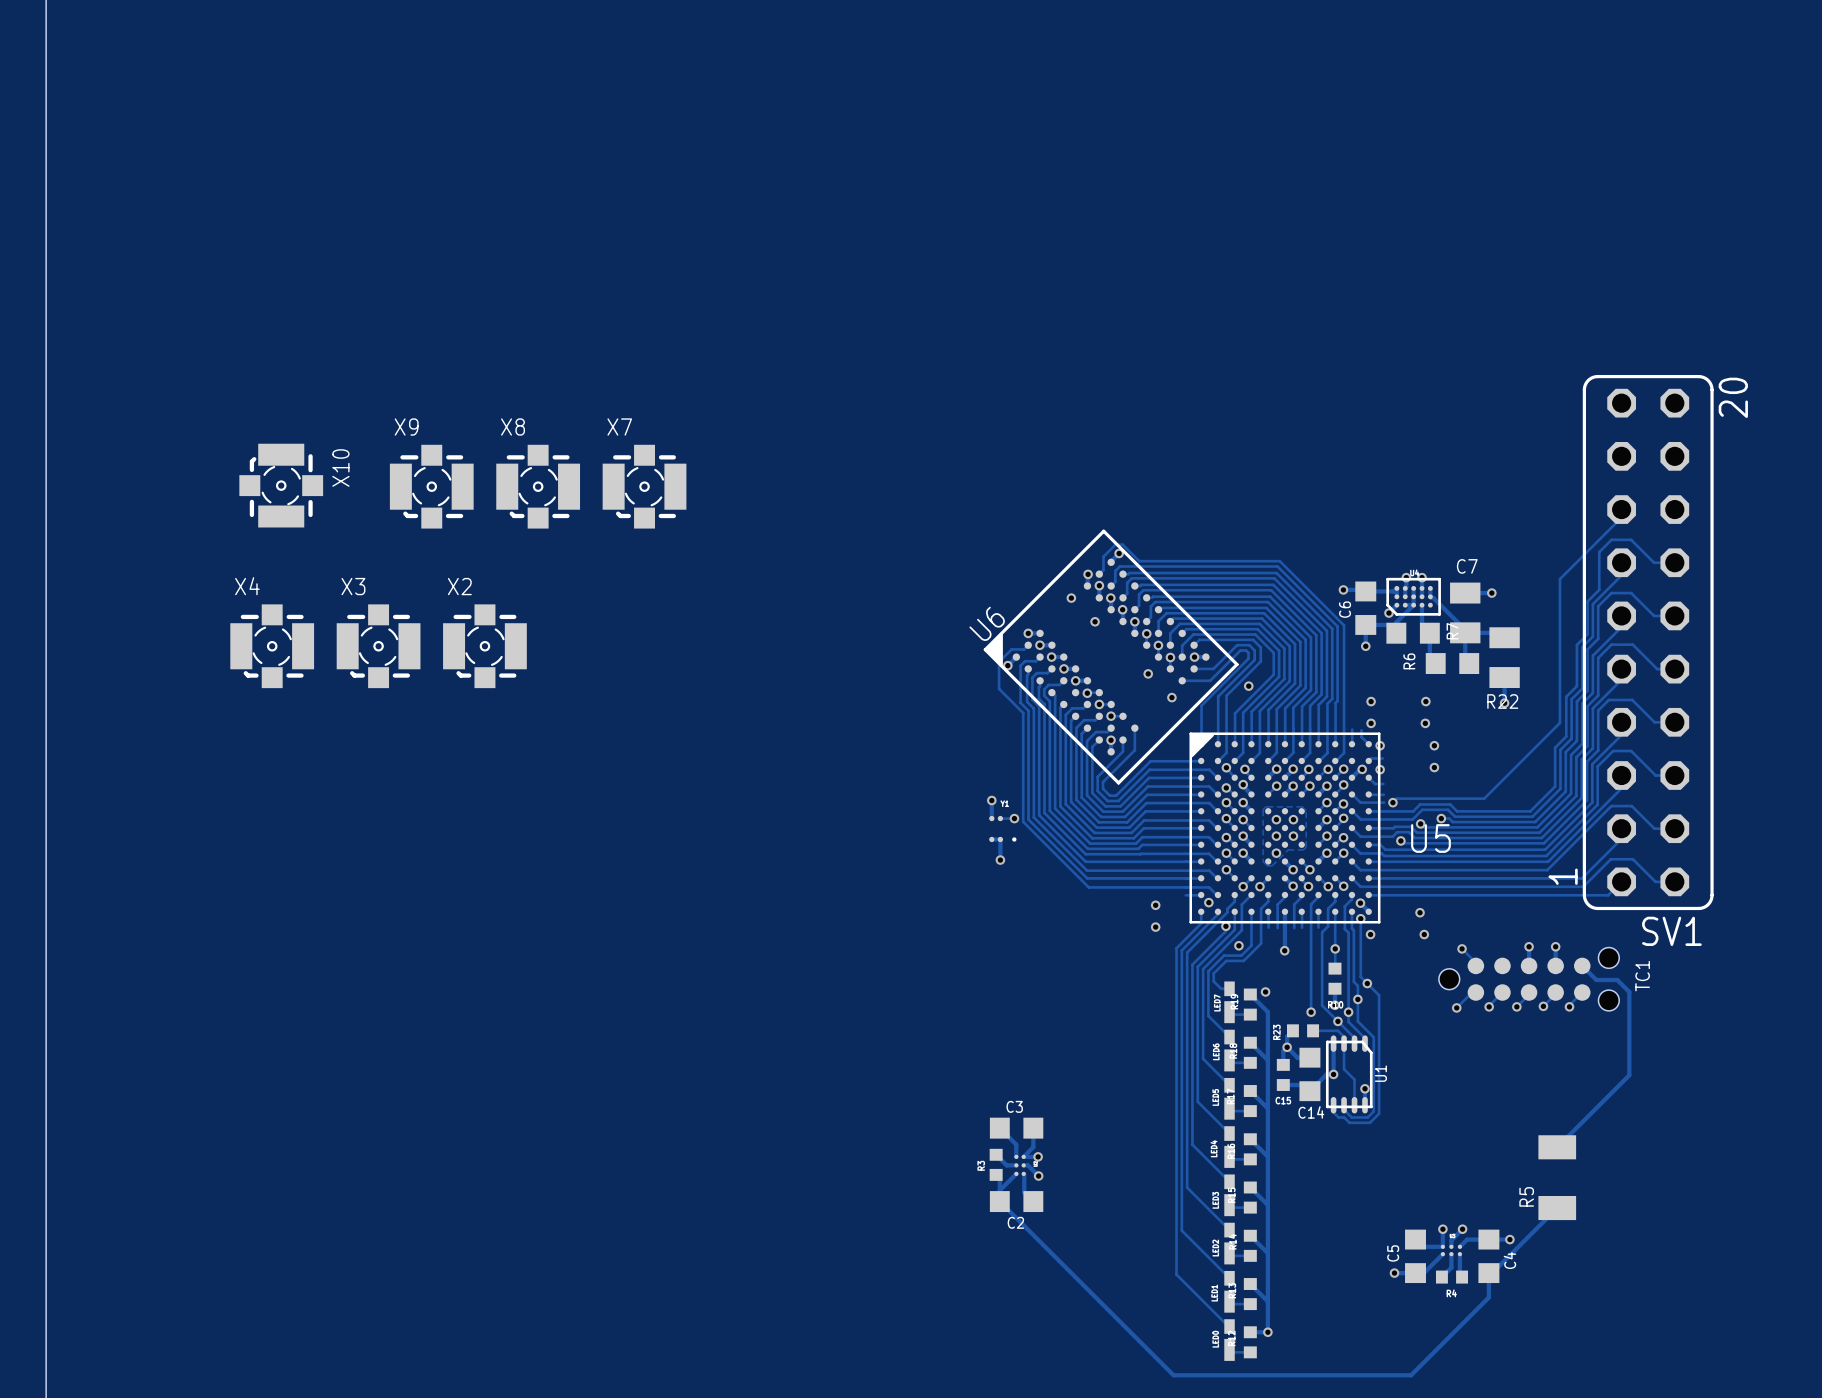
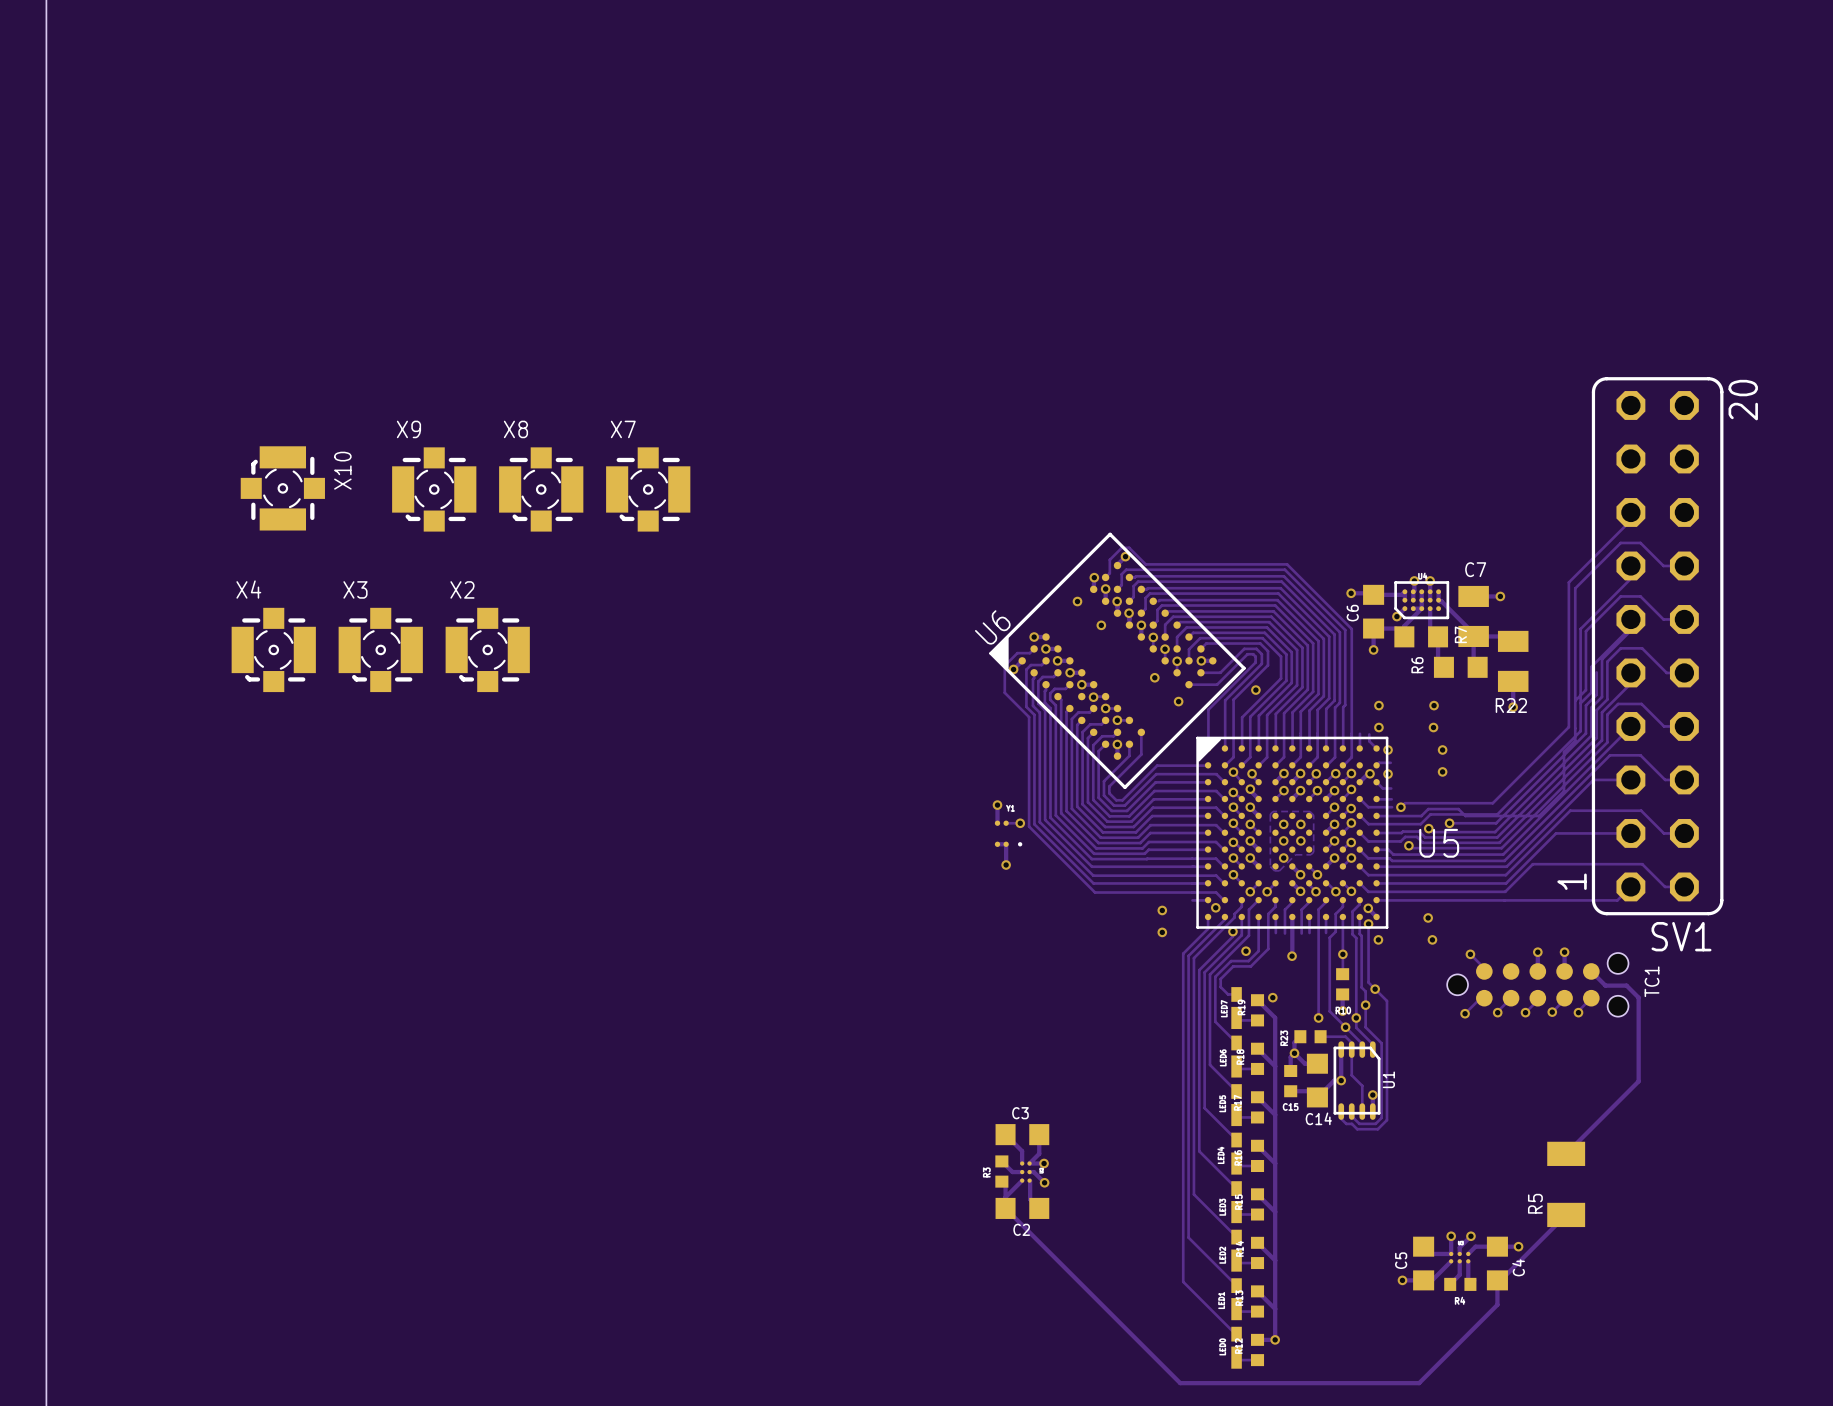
track: (1599, 552) (1599, 589) (1587, 601) (1587, 634) (1576, 645) -> (1608, 555) (1575, 588) (1575, 700)
track: (1592, 604) (1592, 636) (1582, 647) (1582, 663) -> (1630, 627) (1591, 666)
track: none -> (1602, 607) (1580, 629) (1580, 703)
track: (1598, 606) (1598, 638) (1587, 649) (1587, 668) -> (1607, 609) (1585, 631) (1585, 648)
track: (1621, 722) (1621, 735) (1592, 764) (1592, 802) (1545, 849) (1494, 849) -> (1630, 726) (1503, 854)
track: (1571, 727) (1571, 738) (1560, 749) (1560, 788) (1532, 816) (1454, 816) (1448, 809) -> (1580, 731) (1497, 814) (1456, 814)
track: (1576, 729) (1576, 740) (1565, 752) (1565, 791) (1535, 822) (1452, 822) (1449, 818) -> (1585, 733) (1496, 823) (1457, 823)
track: (1582, 731) (1582, 743) (1571, 755) (1571, 793) (1537, 827) (1486, 827) -> (1591, 735) (1495, 832)
track: (1587, 733) (1587, 746) (1576, 757) (1576, 795) (1539, 832) (1488, 832) -> (1596, 738) (1497, 837)
track: (1592, 736) (1592, 748) (1581, 759) (1581, 798) (1541, 838) (1490, 838) -> (1602, 740) (1499, 842)
track: (1598, 738) (1598, 750) (1587, 761) (1587, 800) (1544, 843) (1493, 843) -> (1607, 742) (1501, 848)
track: (1613, 751) (1597, 766) (1597, 804) (1546, 856) (1495, 856) -> (1622, 755) (1610, 755) (1504, 860)
track: (1621, 775) (1621, 788) (1548, 861) (1498, 861) -> (1630, 779) (1593, 779) (1506, 866)
track: (1611, 806) (1547, 870) (1497, 870) -> (1620, 810) (1570, 810) (1505, 875)
track: (1621, 828) (1621, 838) (1581, 878) (1497, 878) -> (1630, 833) (1556, 833) (1505, 883)
track: (1610, 859) (1583, 886) (1496, 886) -> (1620, 864) (1532, 864) (1505, 891)

